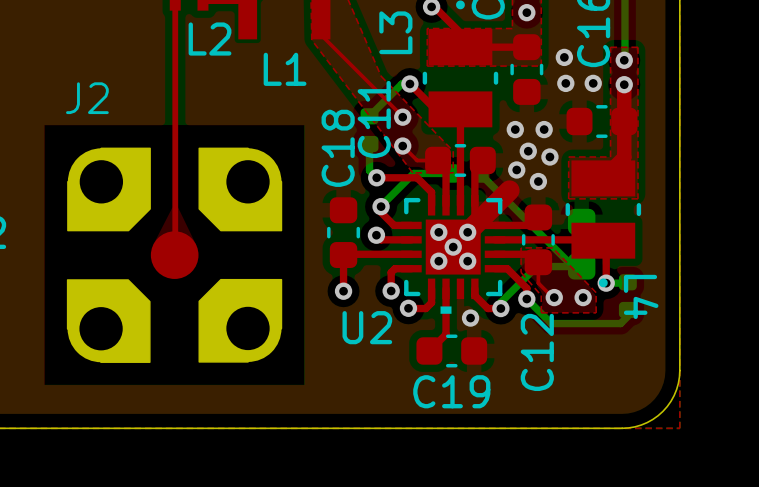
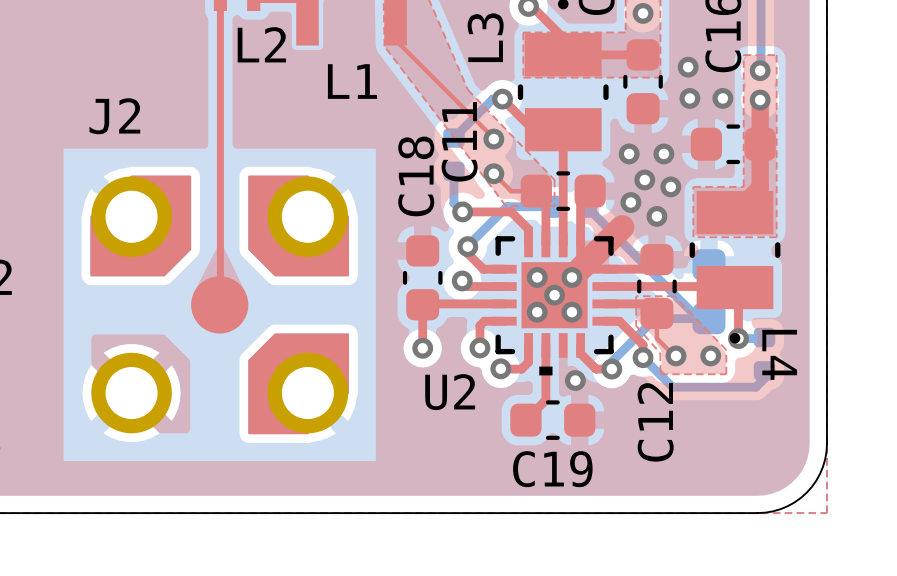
J2 footprint: [66, 147, 283, 363] -> [90, 175, 349, 435]

